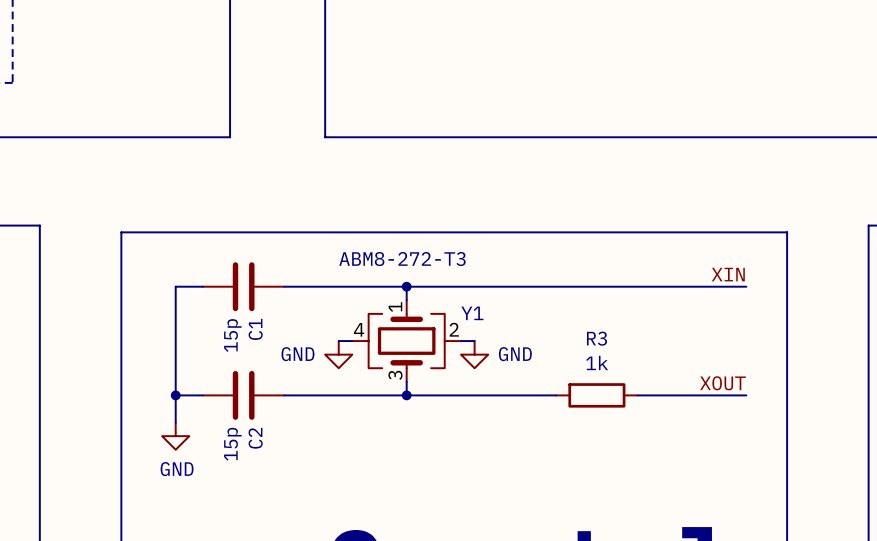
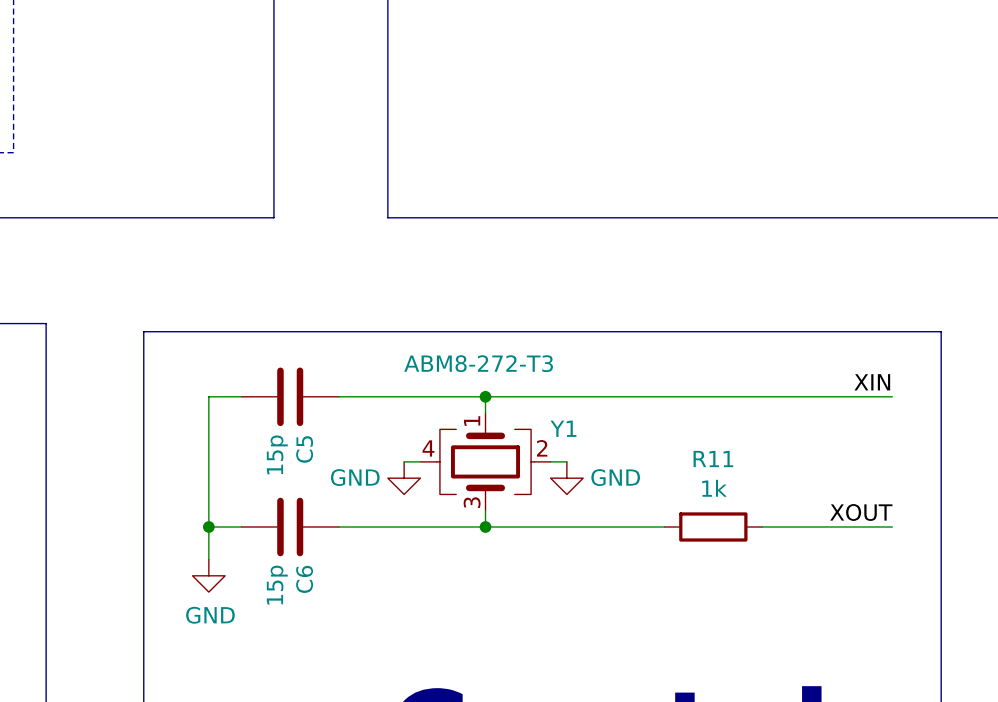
C1 name: C1 (255, 329) -> C5 (304, 449)
R3 name: R3 (596, 338) -> R11 (713, 459)
C2 name: C2 (255, 438) -> C6 (304, 579)

